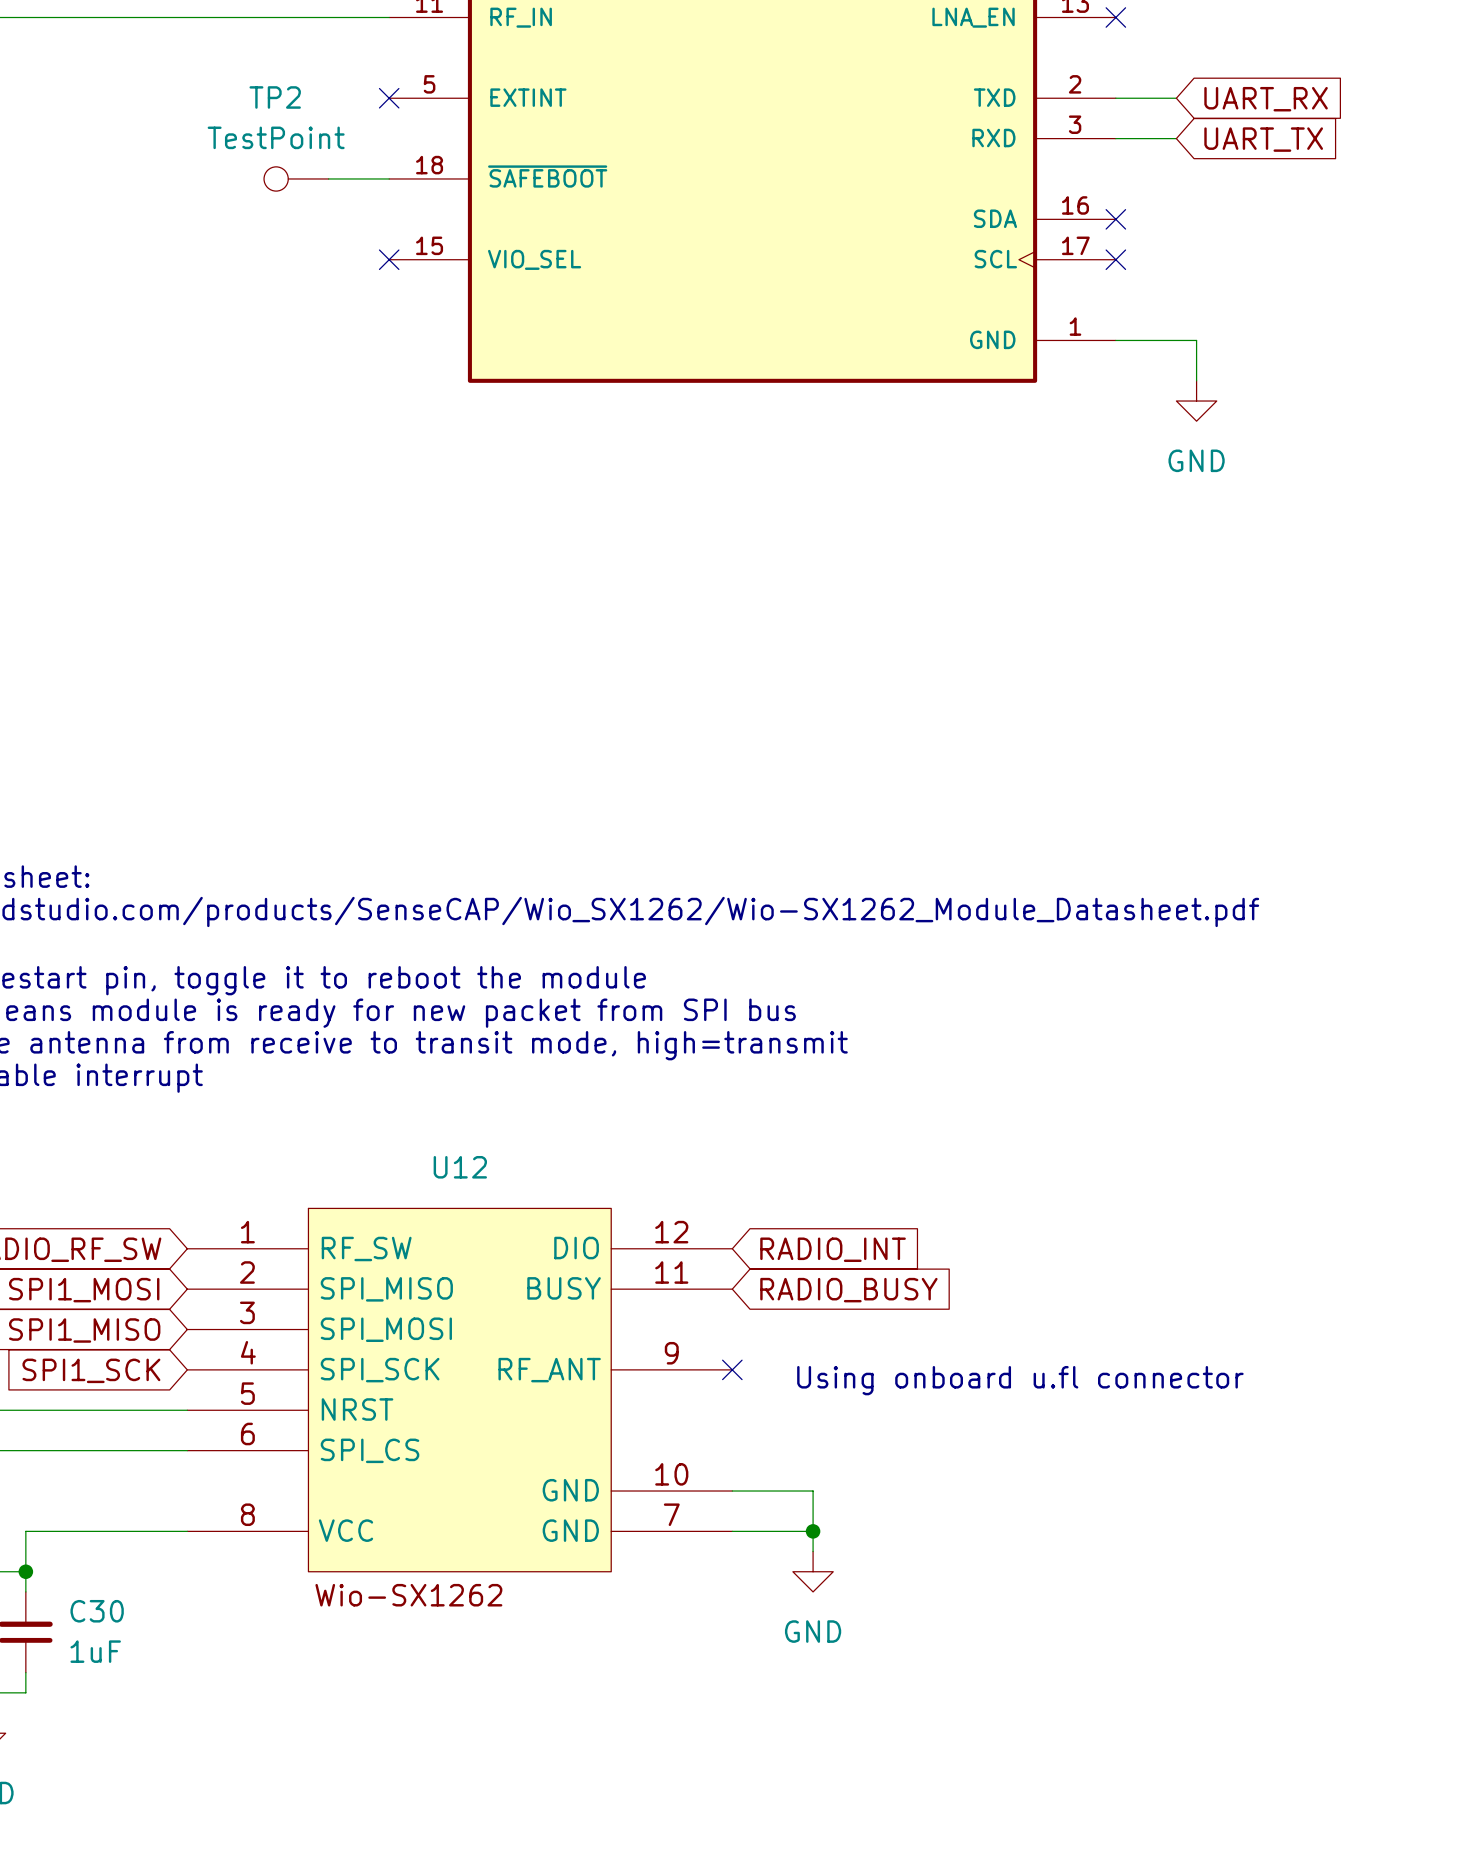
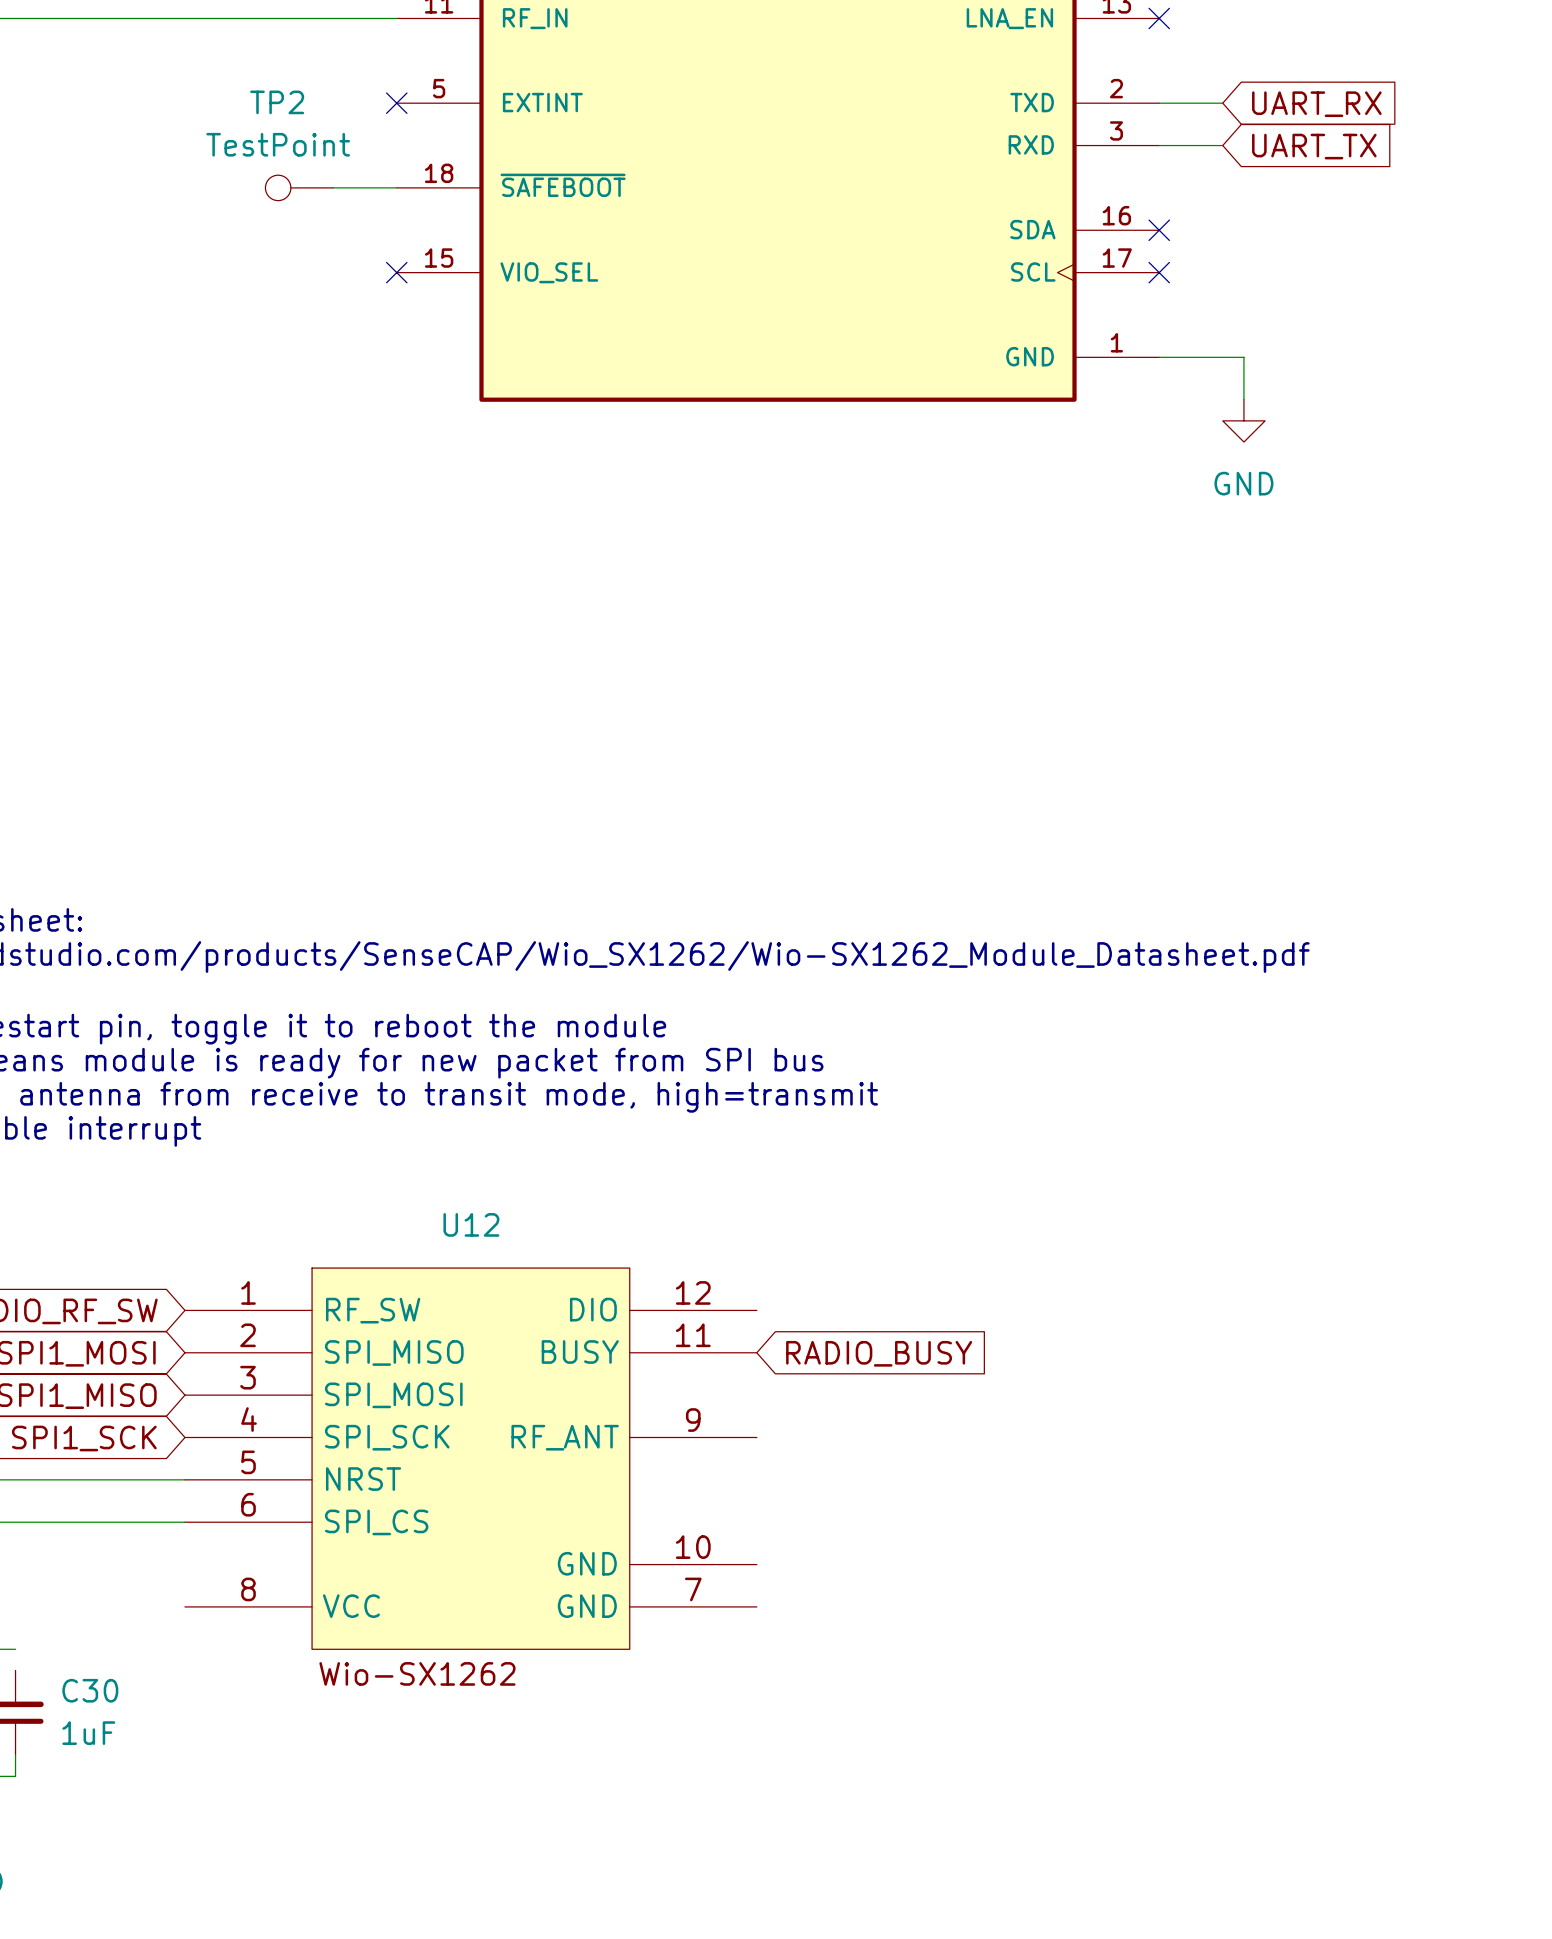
global label: RADIO_INT (833, 1249) -> none
no-connect mark: (732, 1369) -> none
text: Using onboard u.fl connector (1020, 1380) -> none
wire: (732, 1491) (813, 1491) (813, 1551) -> none
wire: (187, 1531) (25, 1531) (25, 1591) -> none
wire: (732, 1531) (813, 1531) -> none
junction: (813, 1531) -> none
junction: (25, 1571) -> none
power symbol: GND (813, 1571) -> none

